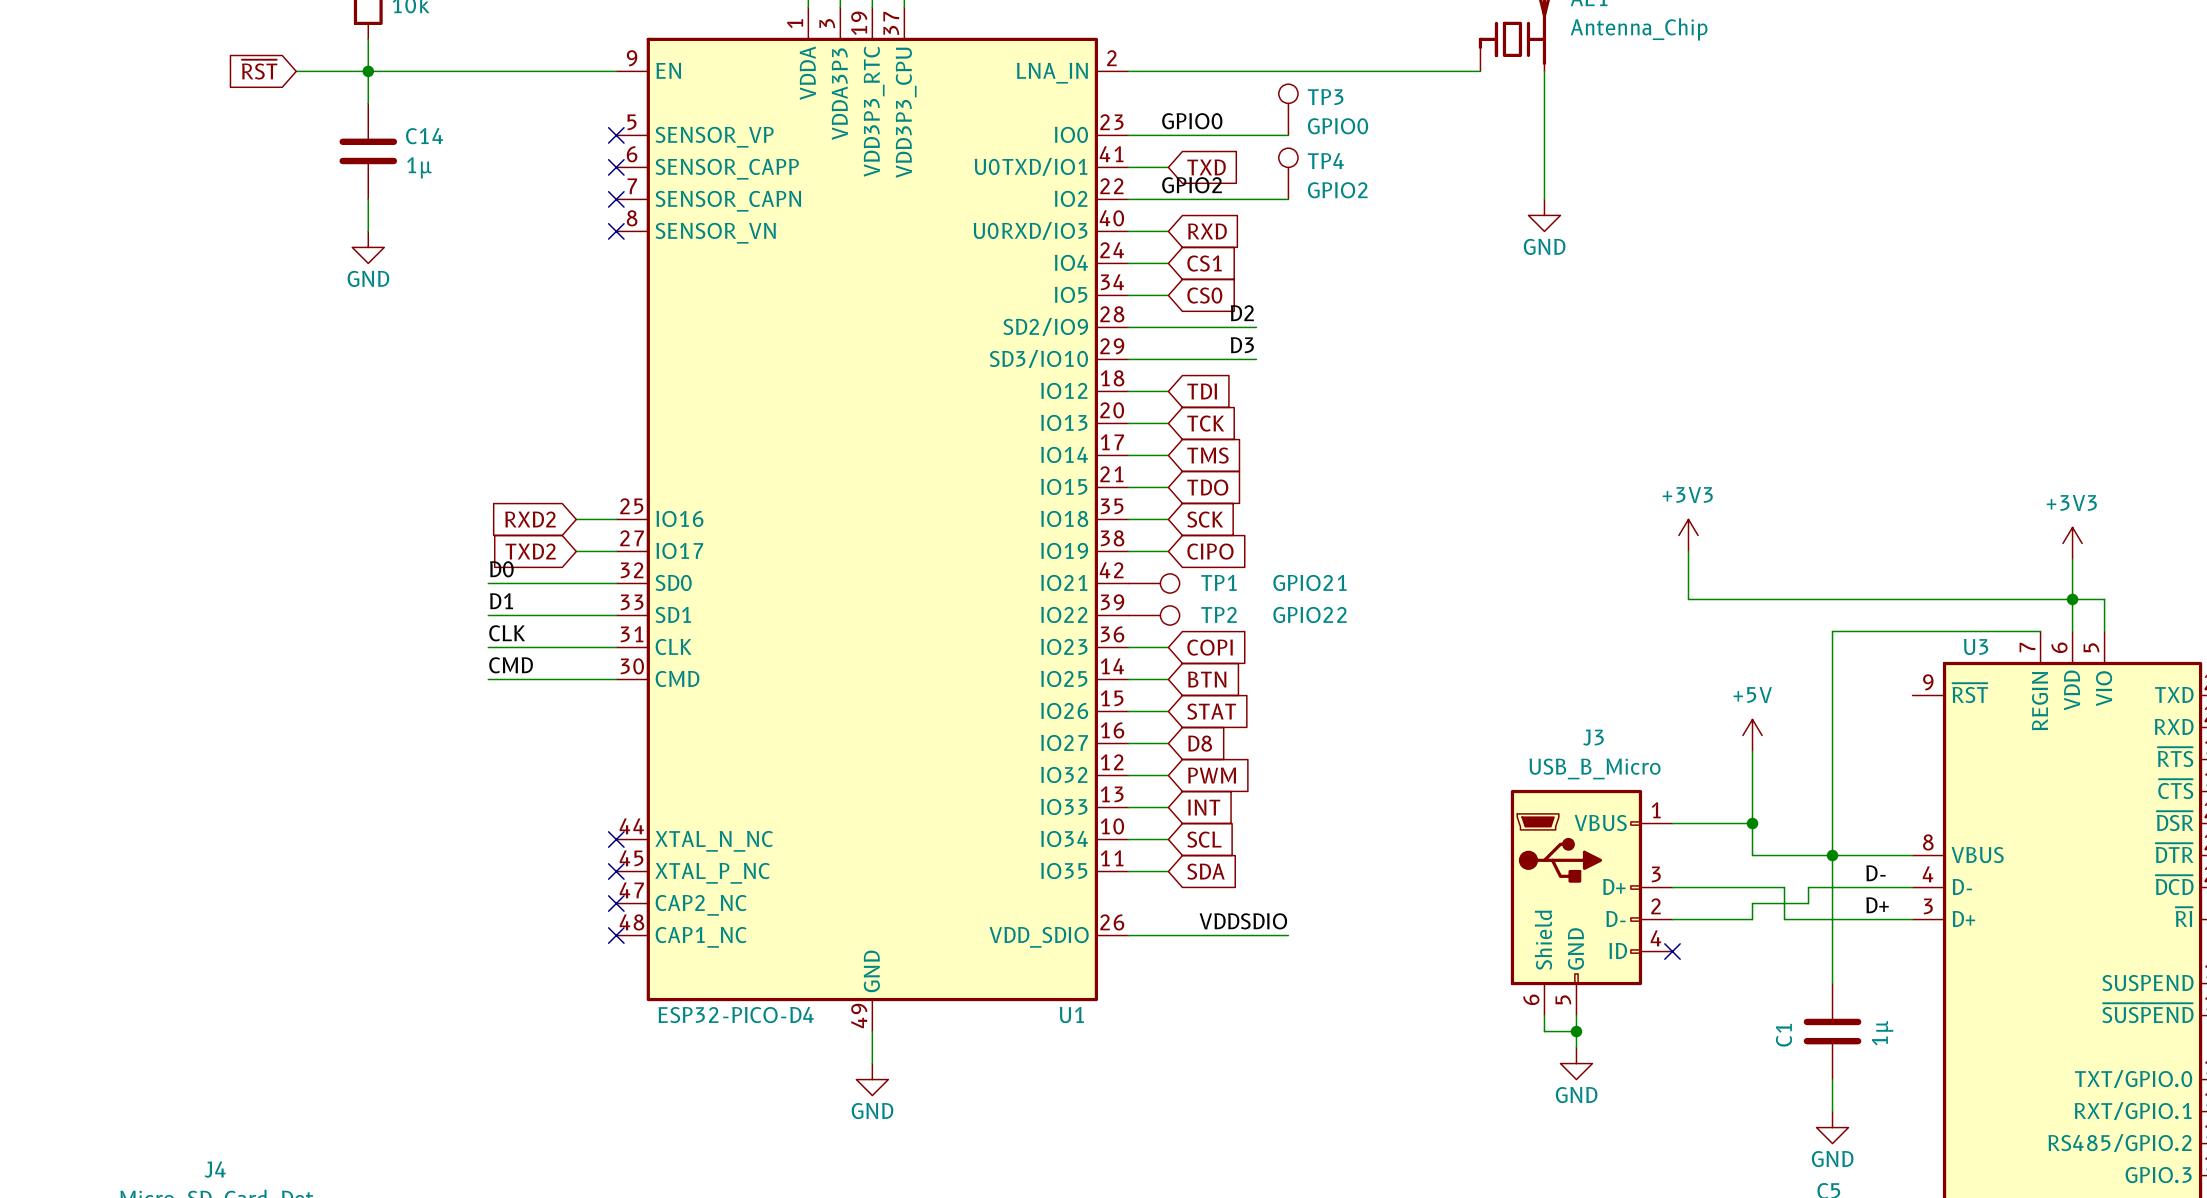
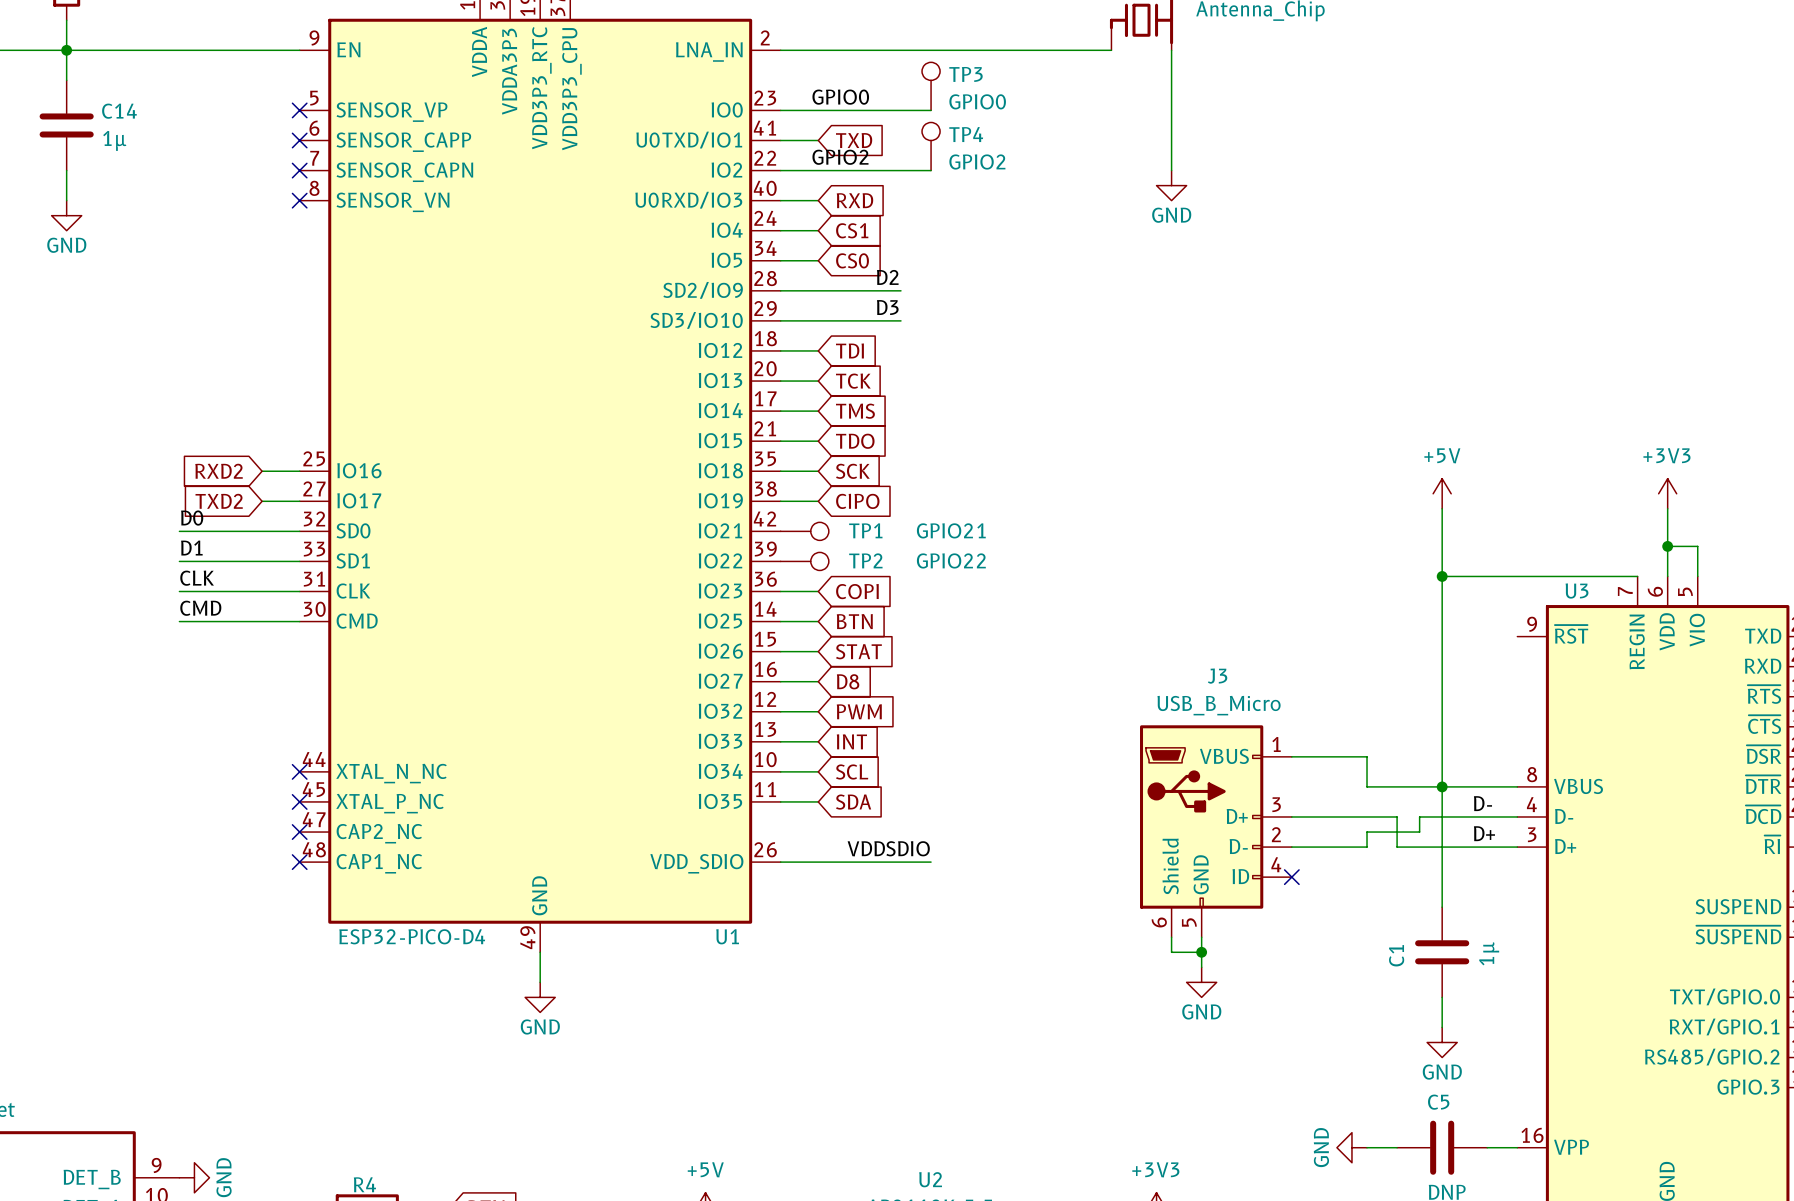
power symbol: +3V3 (1688, 535) -> none
wire: (1688, 551) (1688, 599) (2072, 599) -> none
junction: none -> (1442, 576)
power symbol position: +5V (1752, 735) -> +5V (1442, 493)
wire: (1752, 751) (1752, 823) -> (1442, 508) (1442, 576)
junction: (1752, 823) -> none

